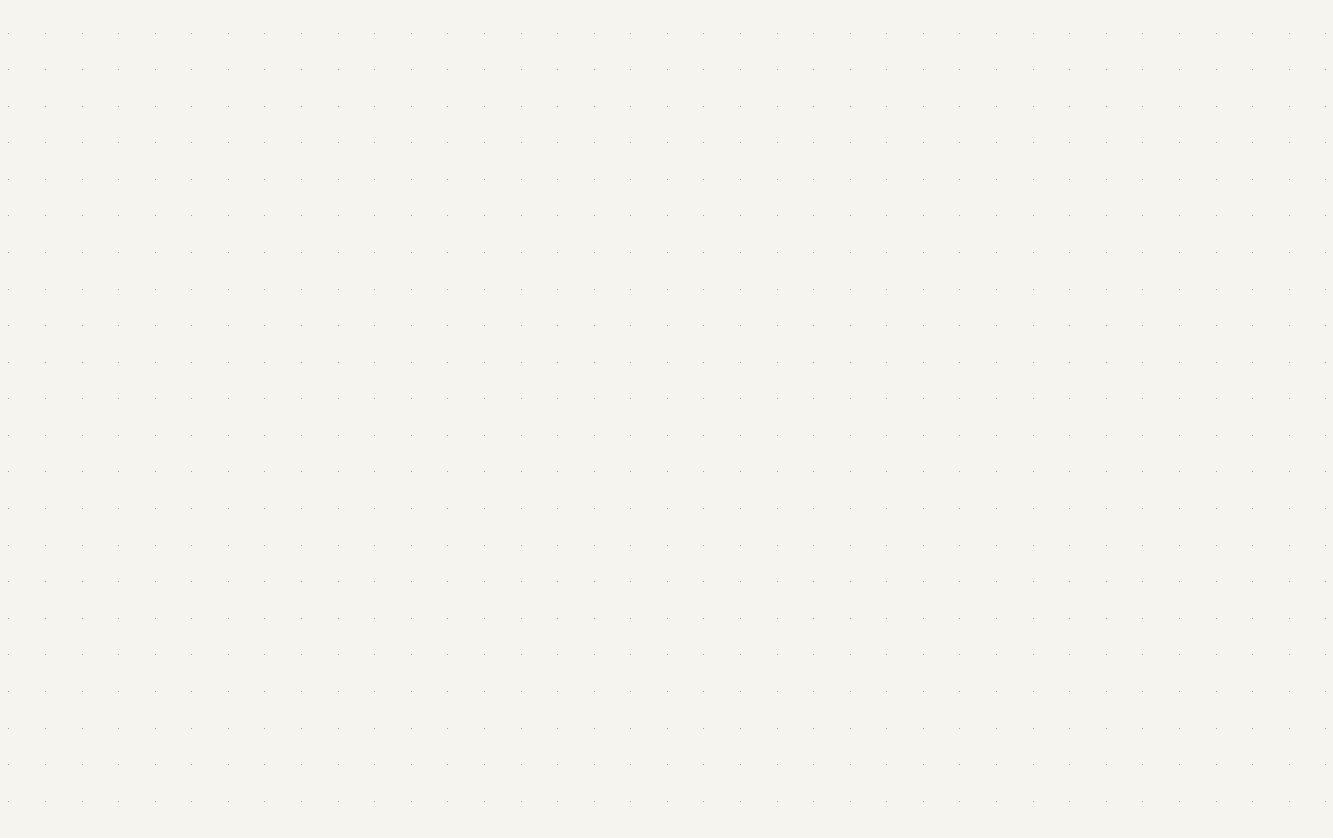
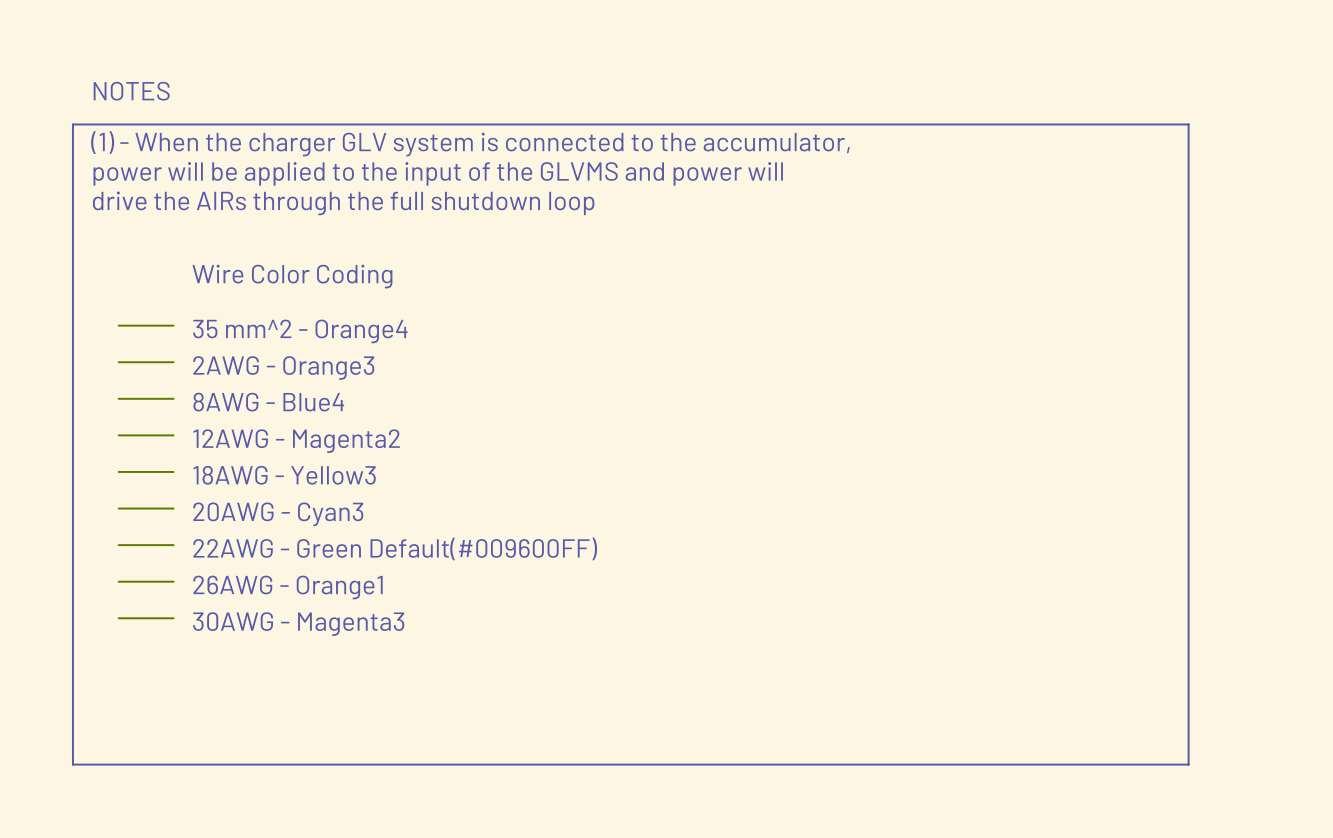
text: none -> NOTES (131, 91)
line: none -> (72, 124) (1188, 124) (1188, 764) (72, 764) (72, 124)
text: none -> (1) - When the charger GLV system is connected to the accumulator, (470, 143)
text: none -> power will be applied to the input of the GLVMS and power will (438, 173)
text: none -> drive the AIRs through the full shutdown loop (343, 203)
text: none -> Wire Color Coding (292, 276)
wire: none -> (118, 325) (173, 325)
text: none -> 35 mm^2 - Orange4 (300, 331)
wire: none -> (118, 362) (173, 362)
text: none -> 2AWG - Orange3 (283, 368)
wire: none -> (118, 398) (173, 398)
text: none -> 8AWG - Blue4 (268, 402)
wire: none -> (118, 435) (173, 435)
text: none -> 12AWG - Magenta2 (296, 441)
wire: none -> (118, 471) (173, 471)
text: none -> 18AWG - Yellow3 (284, 475)
wire: none -> (118, 508) (173, 508)
text: none -> 20AWG - Cyan3 (278, 514)
wire: none -> (118, 545) (173, 545)
text: none -> 22AWG - Green Default(#009600FF) (395, 548)
wire: none -> (118, 581) (173, 581)
text: none -> 26AWG - Orange1 (287, 587)
wire: none -> (118, 618) (173, 618)
text: none -> 30AWG - Magenta3 (298, 624)

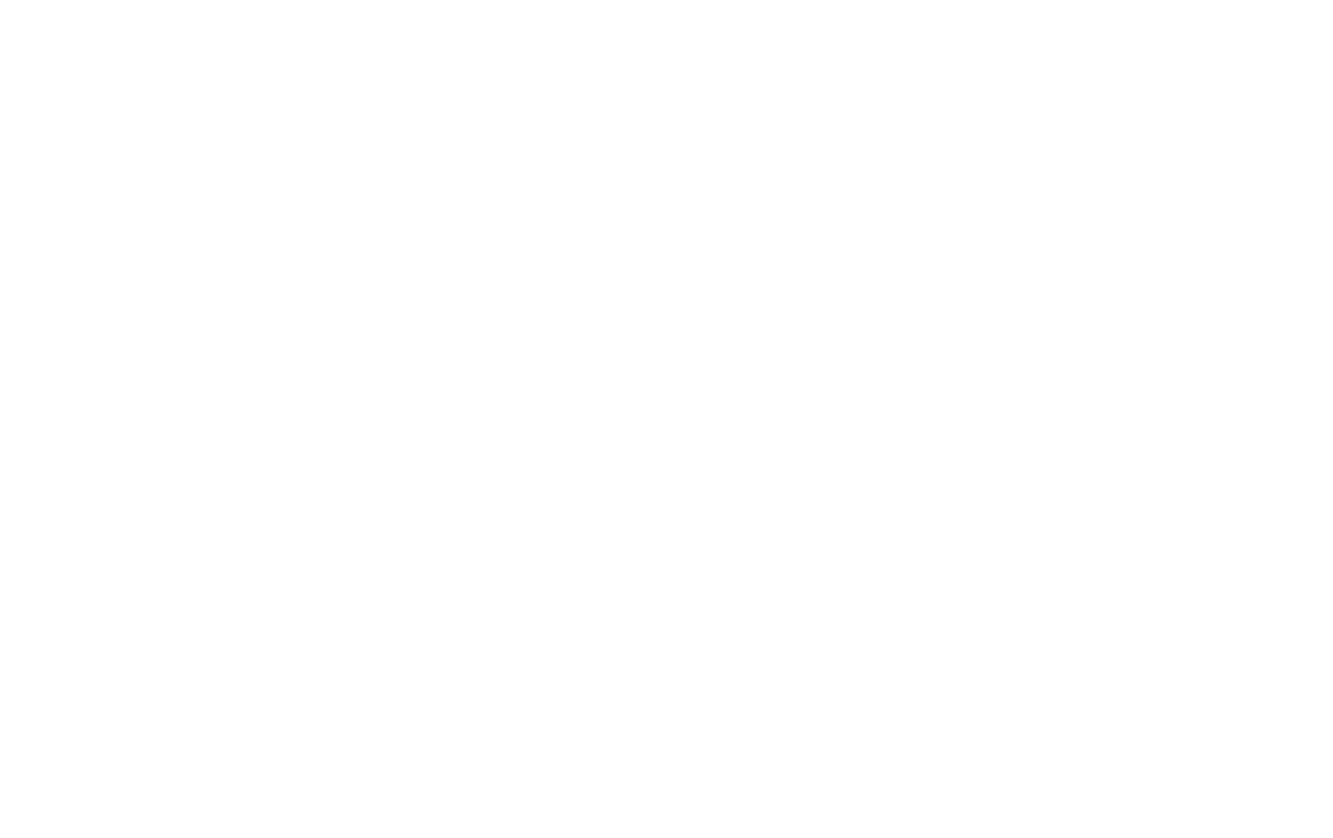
text: NOTES (131, 91) -> none
line: (72, 124) (1188, 124) (1188, 764) (72, 764) (72, 124) -> none
text: (1) - When the charger GLV system is connected to the accumulator, (470, 143) -> none
text: power will be applied to the input of the GLVMS and power will (438, 173) -> none
text: drive the AIRs through the full shutdown loop (343, 203) -> none
text: Wire Color Coding (292, 276) -> none
wire: (118, 325) (173, 325) -> none
text: 35 mm^2 - Orange4 (300, 331) -> none
wire: (118, 362) (173, 362) -> none
text: 2AWG - Orange3 (283, 368) -> none
wire: (118, 398) (173, 398) -> none
text: 8AWG - Blue4 (268, 402) -> none
wire: (118, 435) (173, 435) -> none
text: 12AWG - Magenta2 (296, 441) -> none
wire: (118, 471) (173, 471) -> none
text: 18AWG - Yellow3 (284, 475) -> none
wire: (118, 508) (173, 508) -> none
text: 20AWG - Cyan3 (278, 514) -> none
wire: (118, 545) (173, 545) -> none
text: 22AWG - Green Default(#009600FF) (395, 548) -> none
wire: (118, 581) (173, 581) -> none
text: 26AWG - Orange1 (287, 587) -> none
wire: (118, 618) (173, 618) -> none
text: 30AWG - Magenta3 (298, 624) -> none

